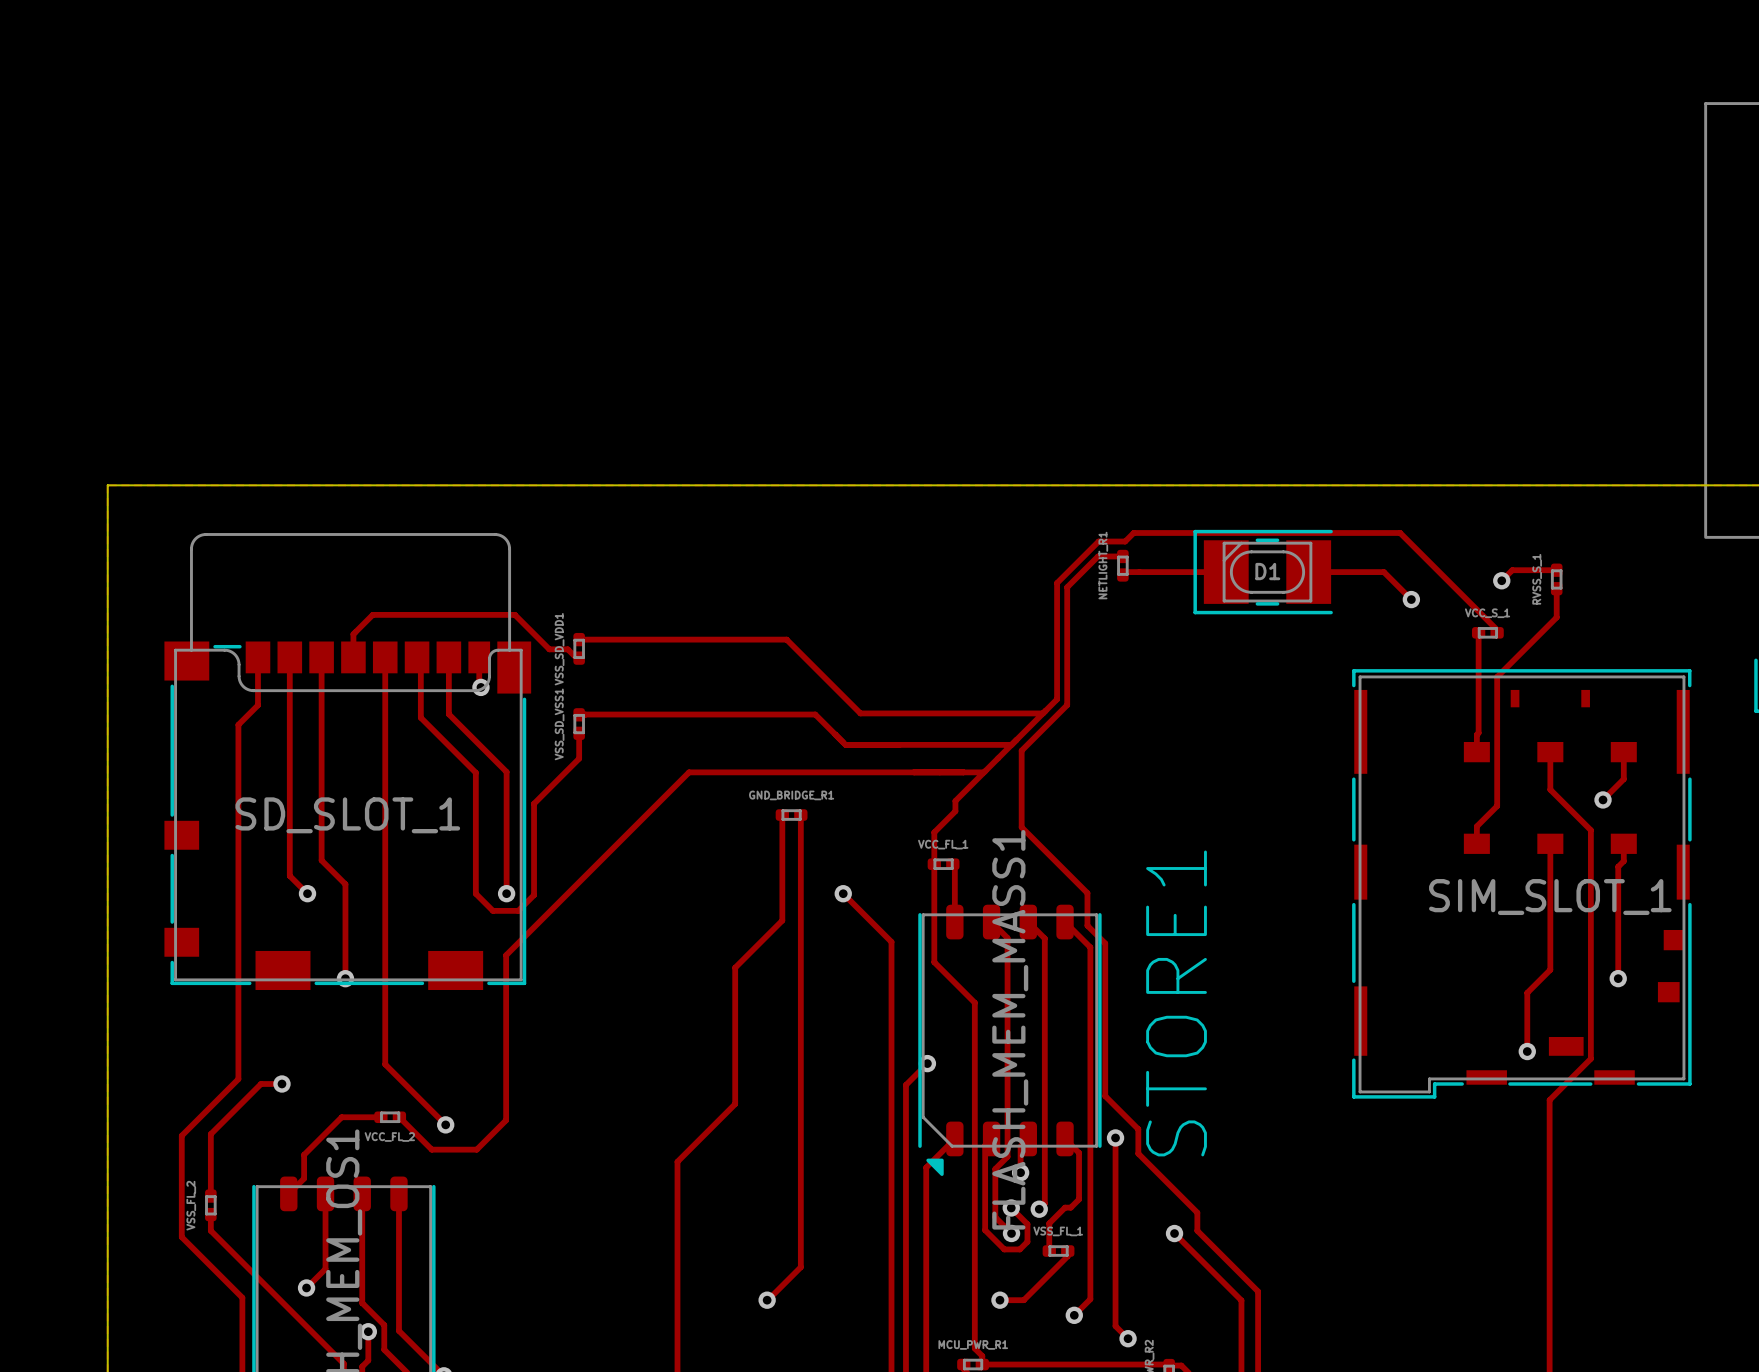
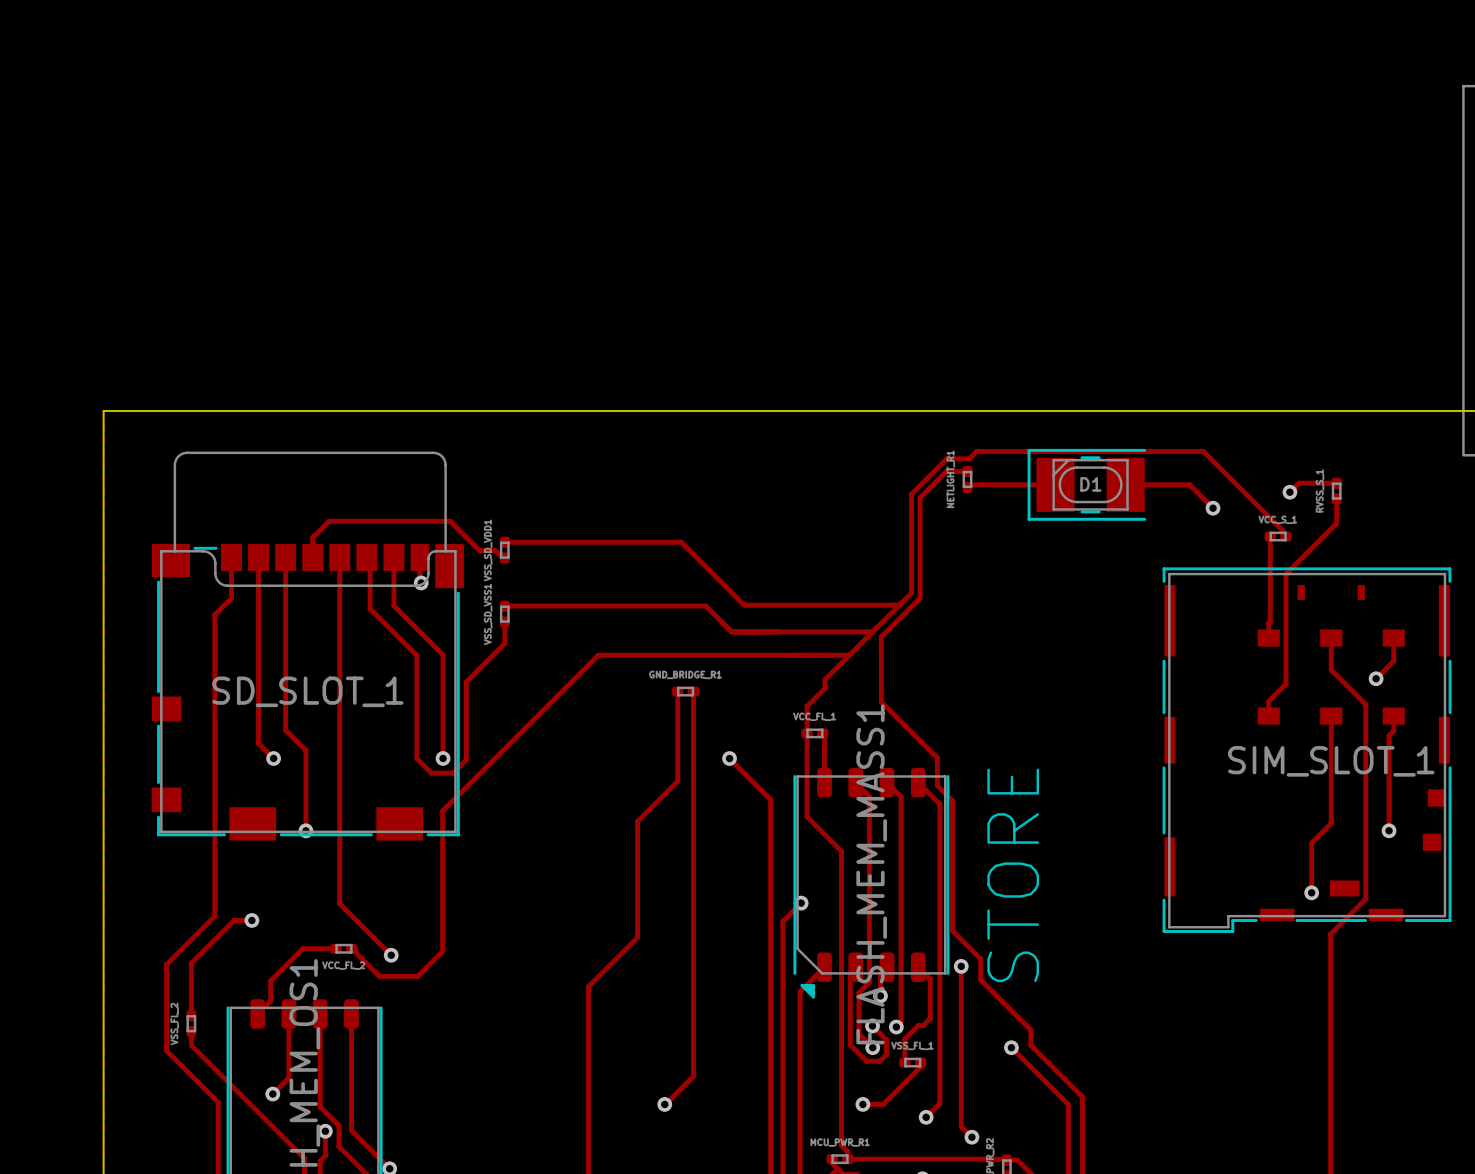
text: STORE1 (1176, 1003) -> STORE (1013, 875)

